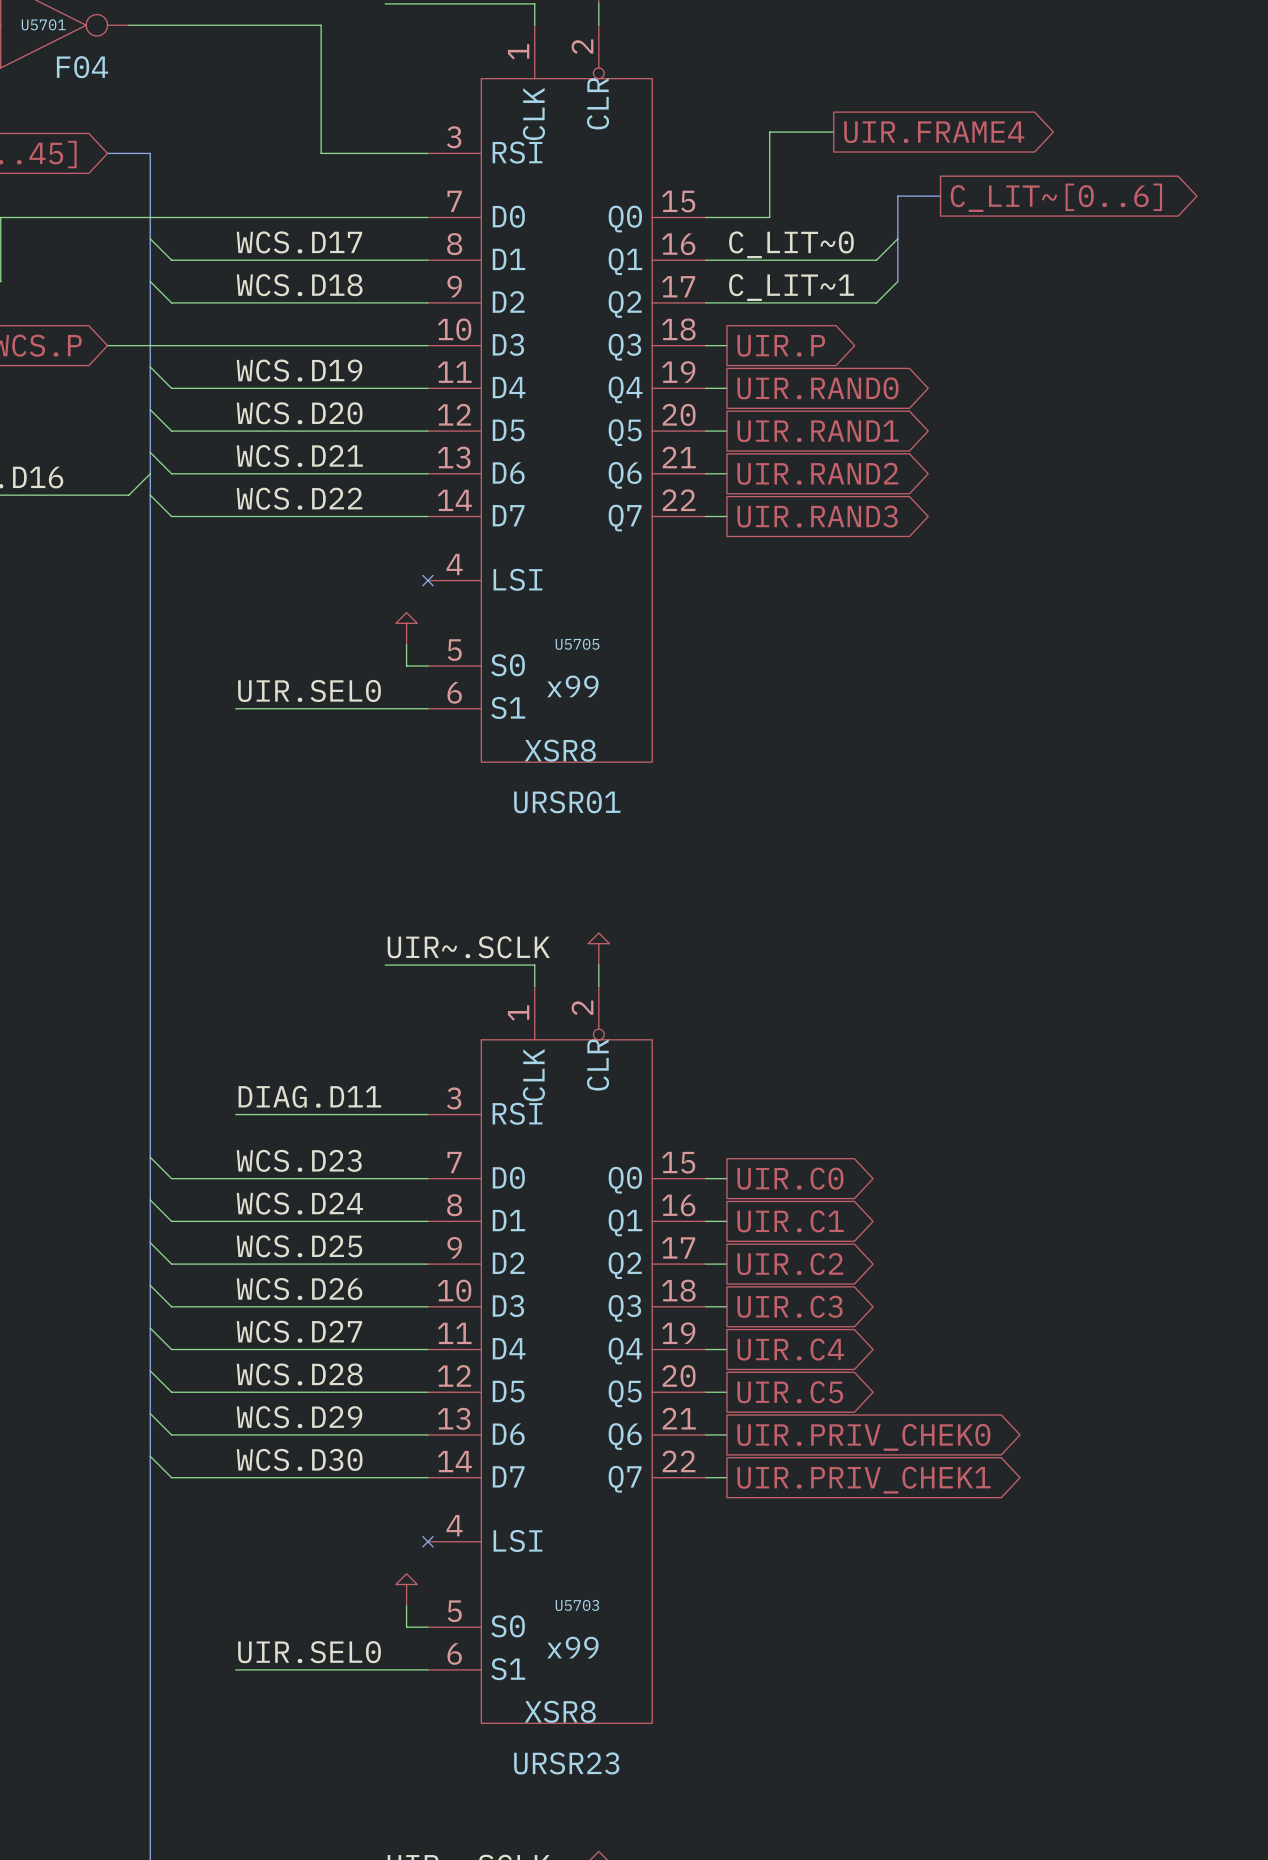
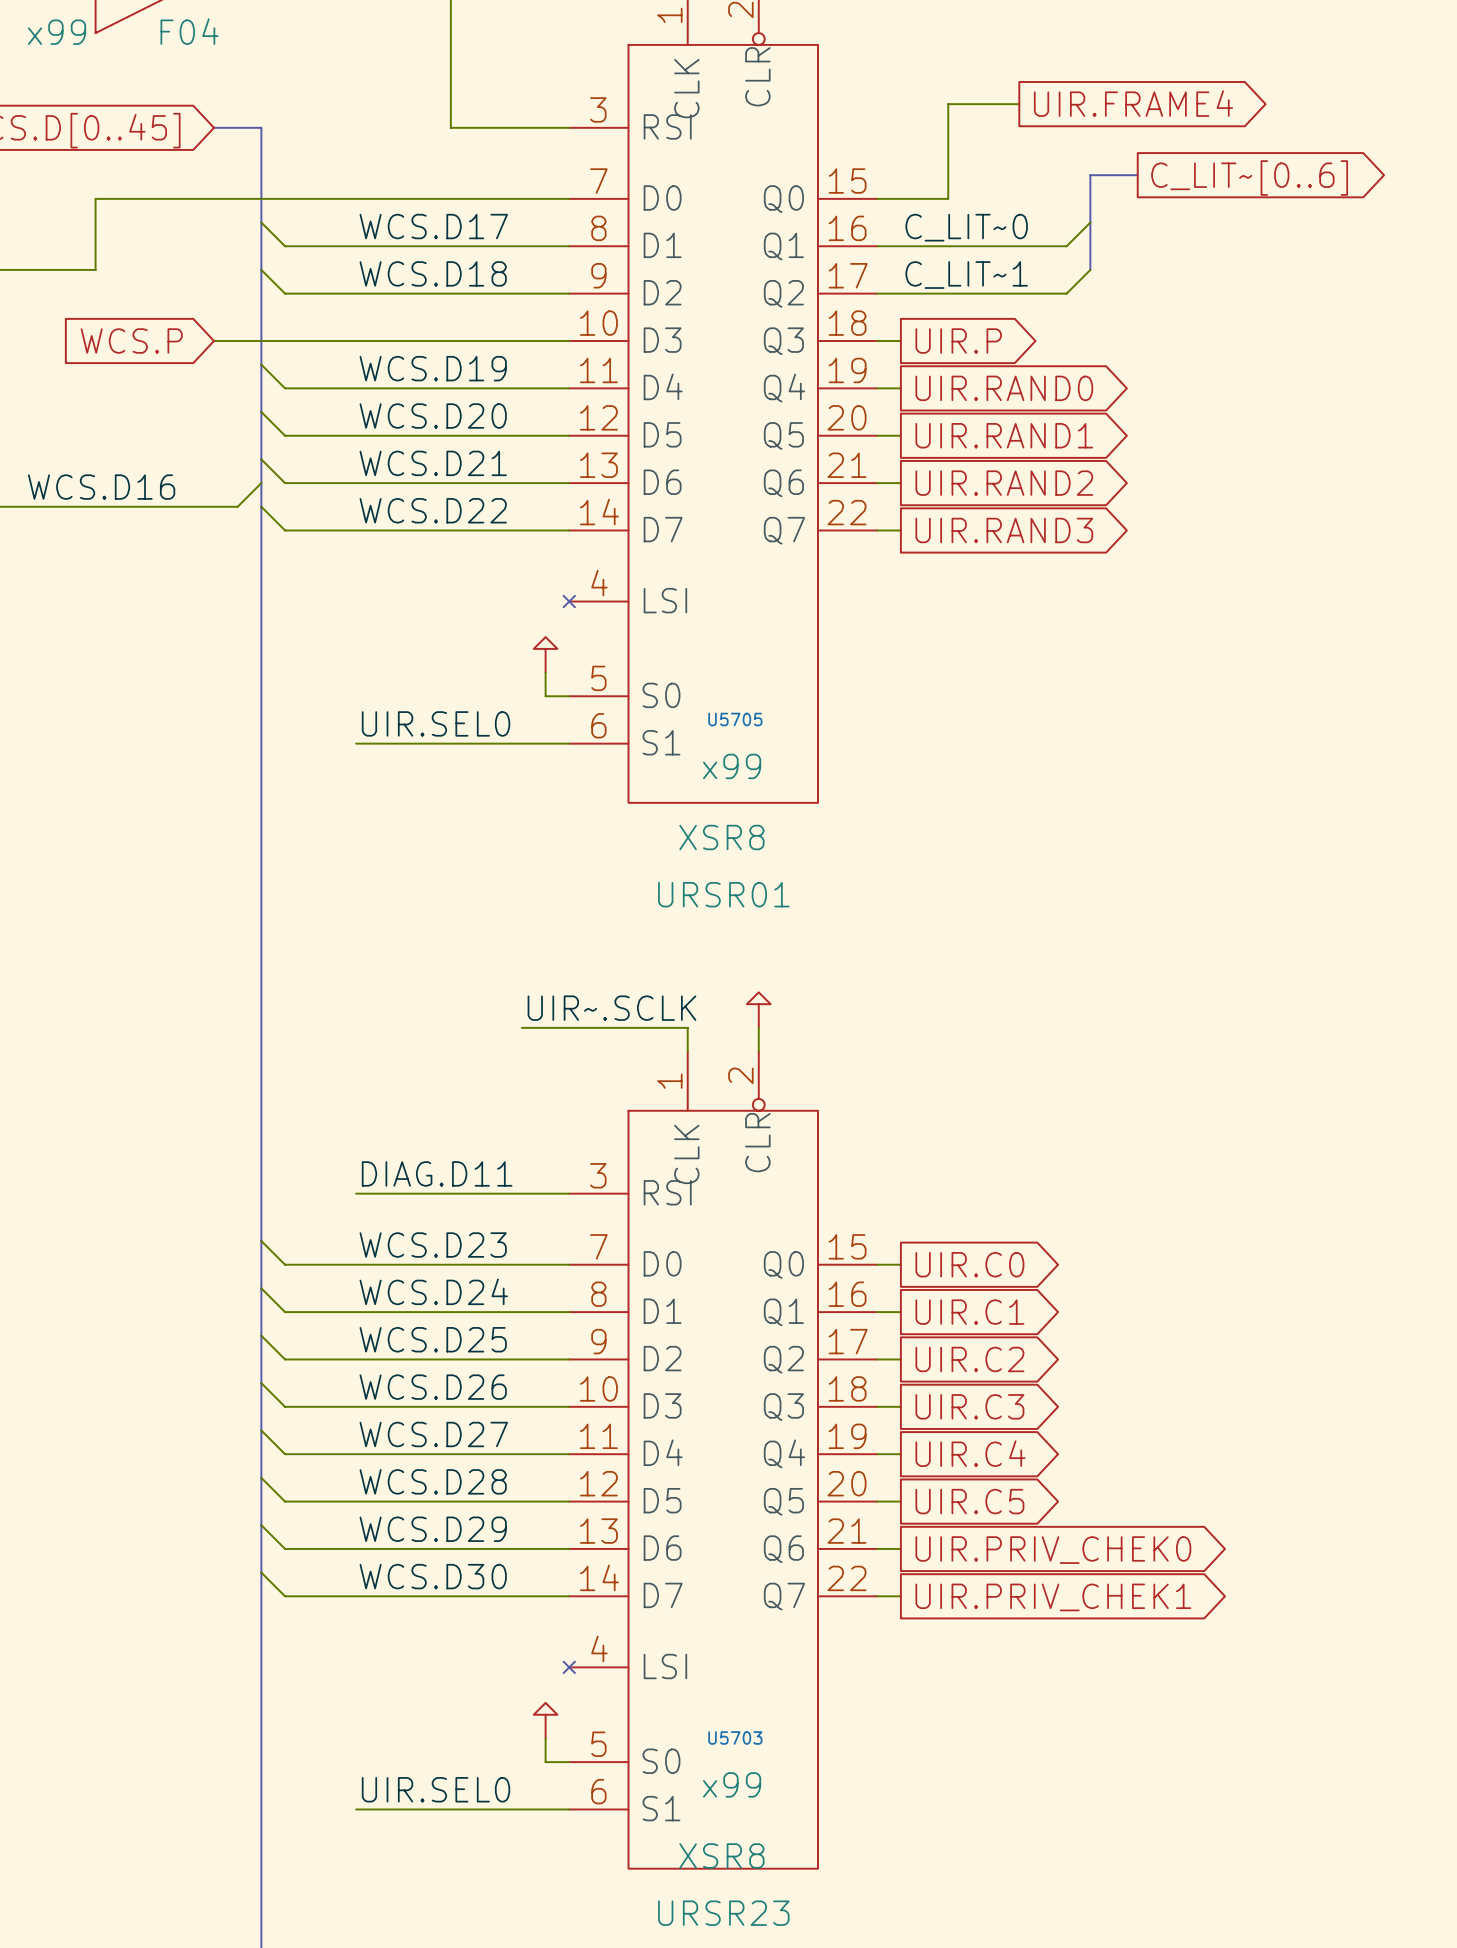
U5705 name position: U5705 (577, 644) -> U5705 (735, 719)
U5705 text position: x99 (572, 686) -> x99 (732, 766)
U5705 value position: XSR8 (560, 750) -> XSR8 (721, 837)
U5705 text position: URSR01 (567, 802) -> URSR01 (723, 894)

